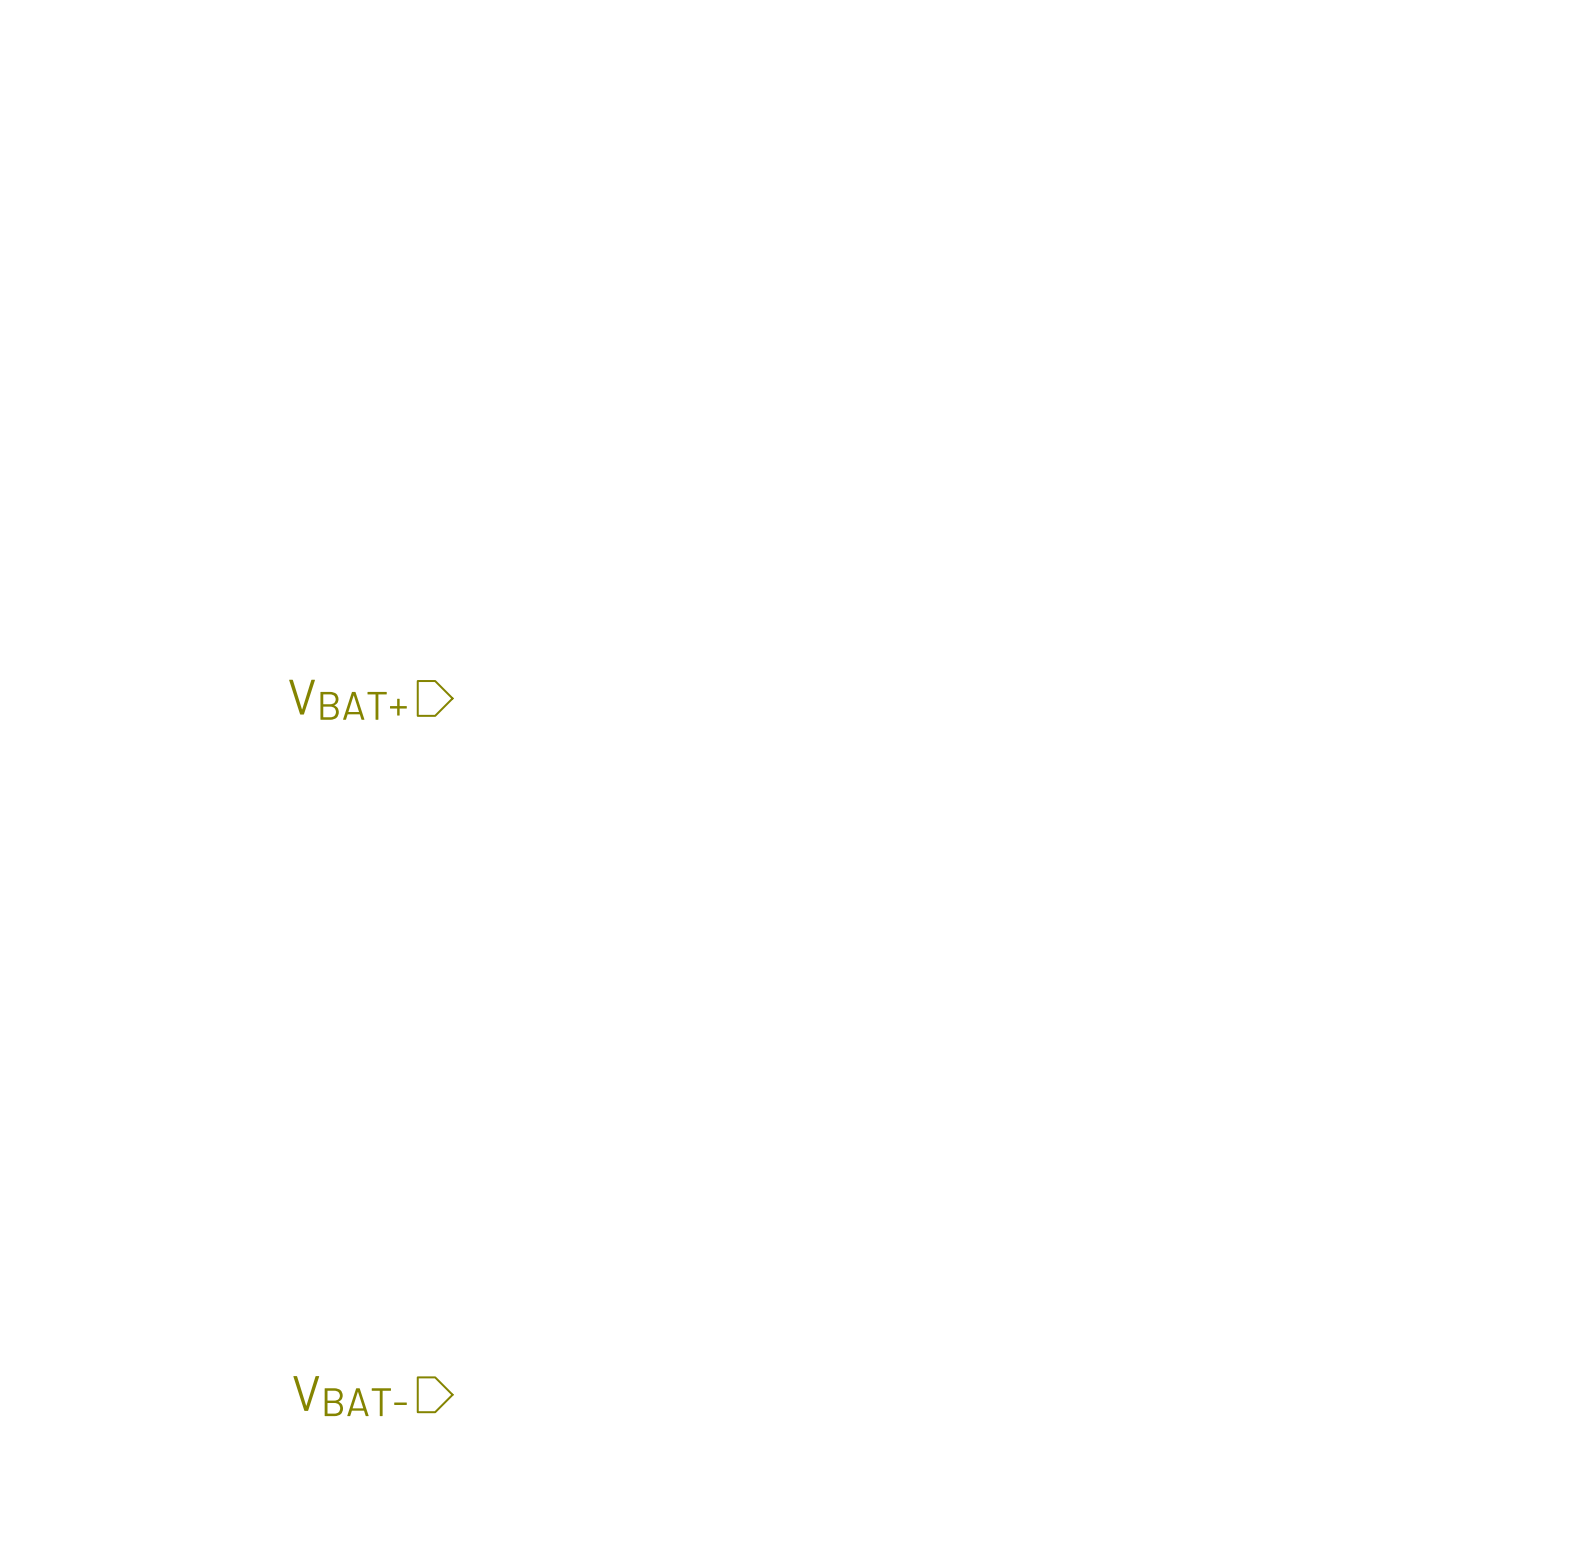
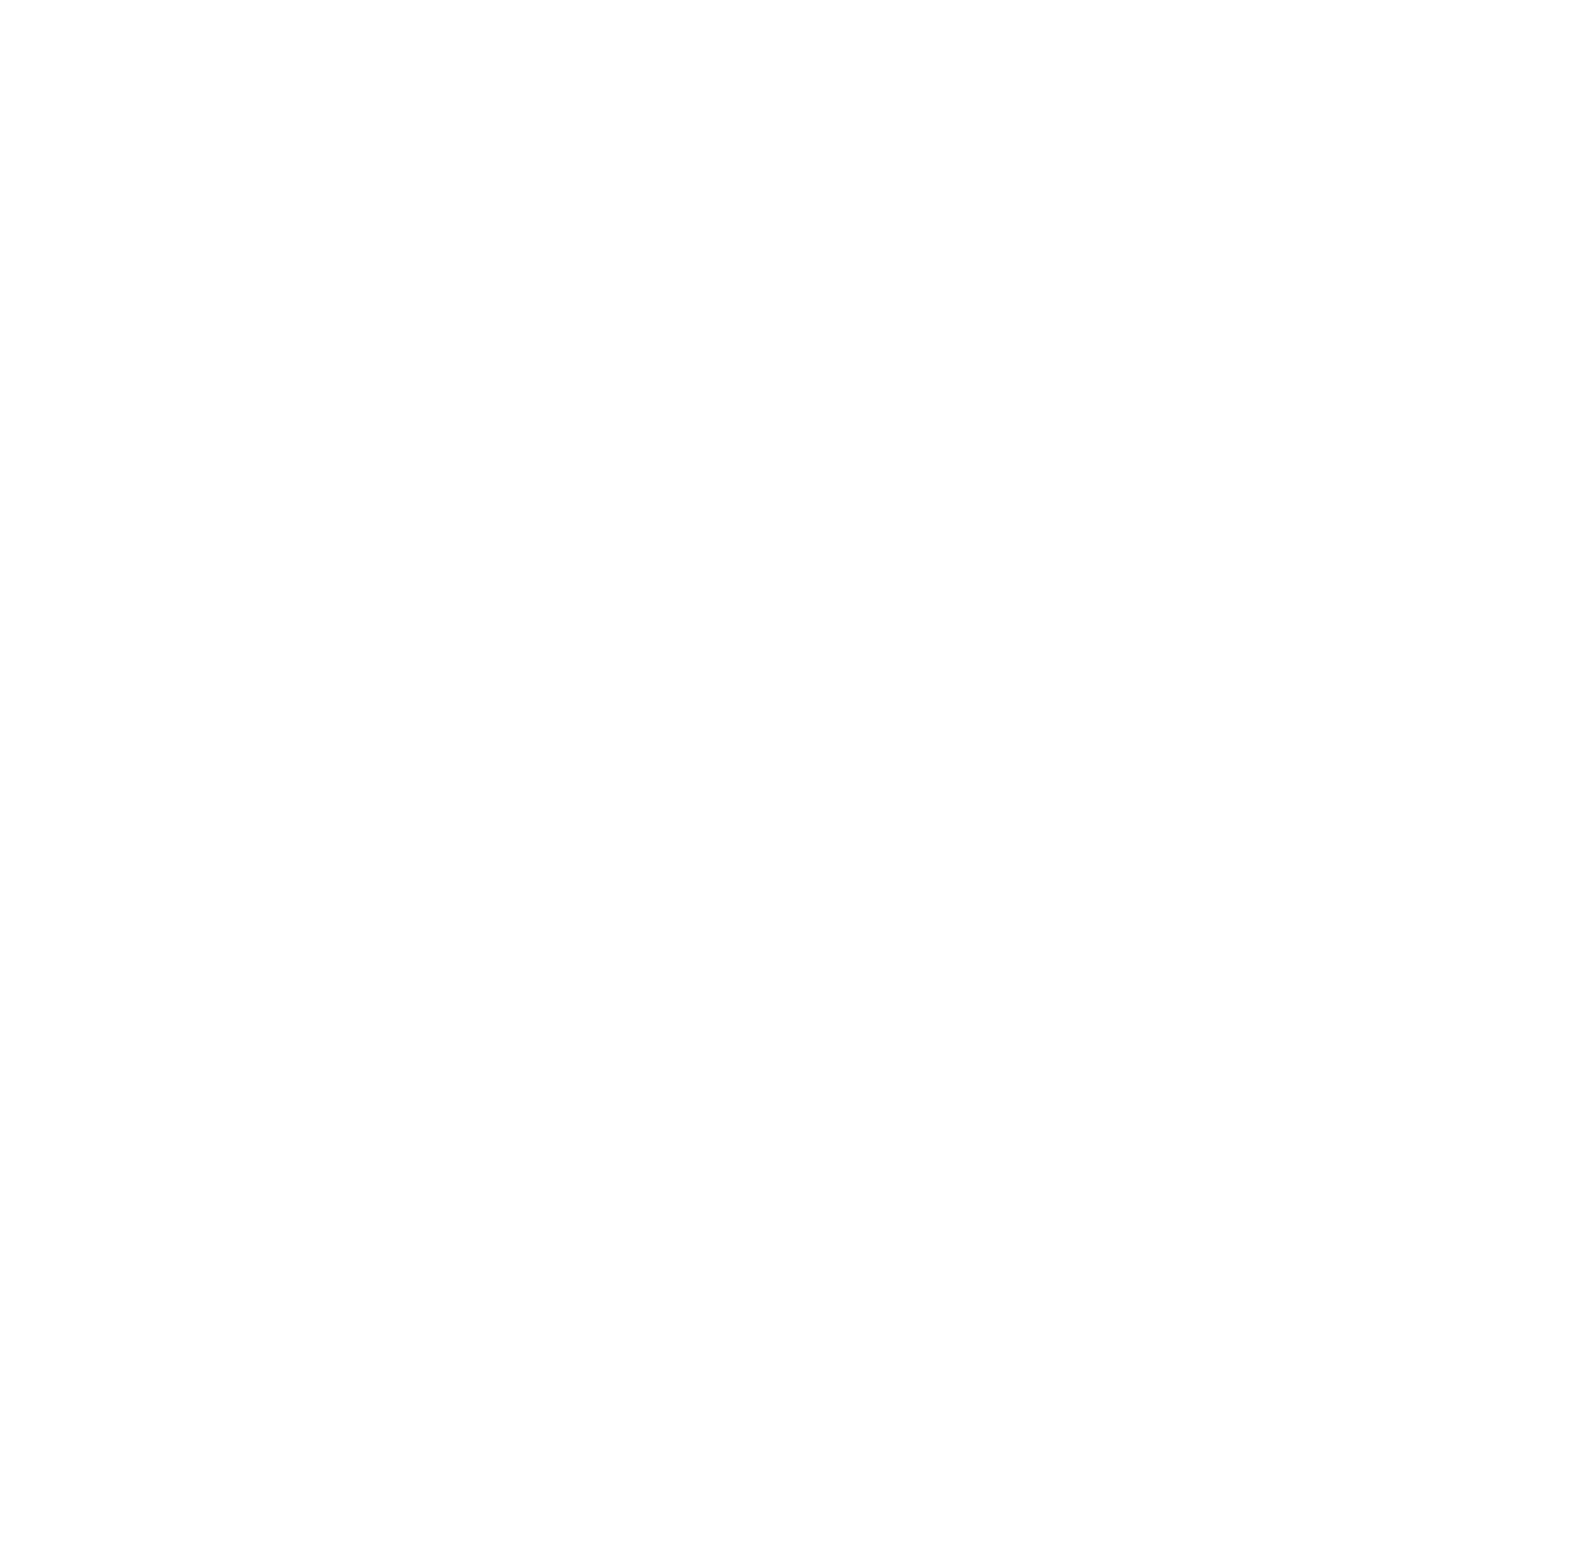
hierarchical label: VBAT+ (347, 699) -> none
hierarchical label: VBAT- (350, 1396) -> none

